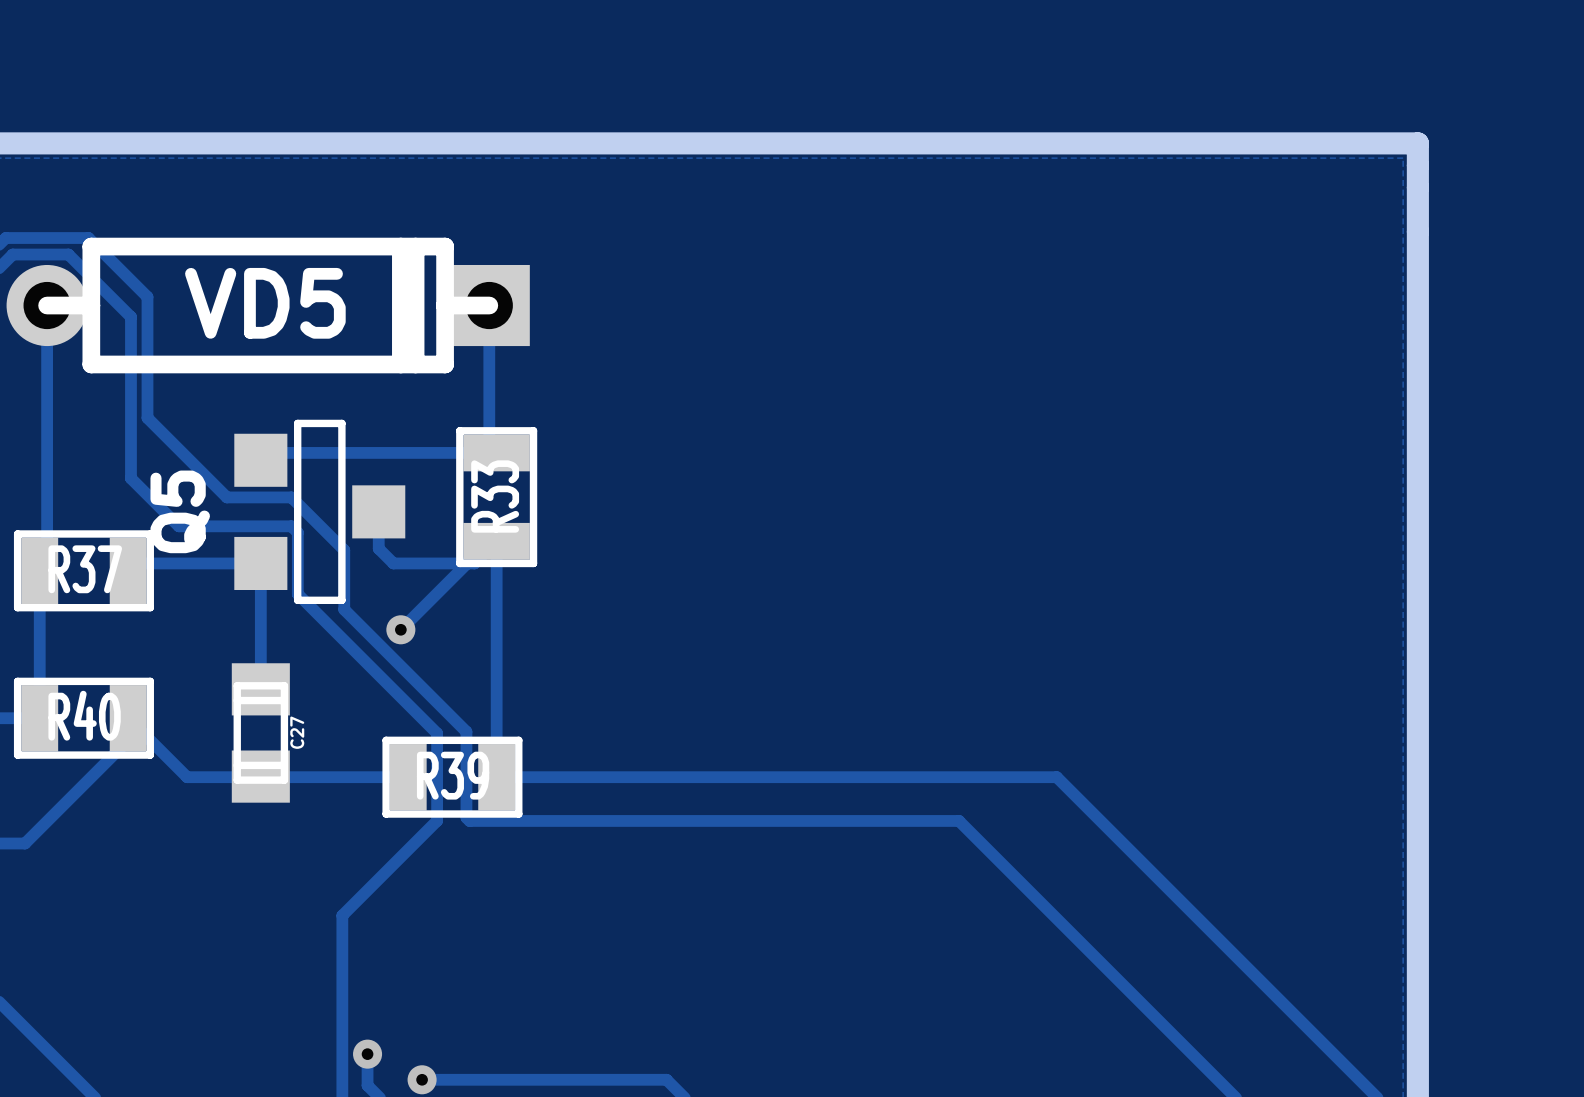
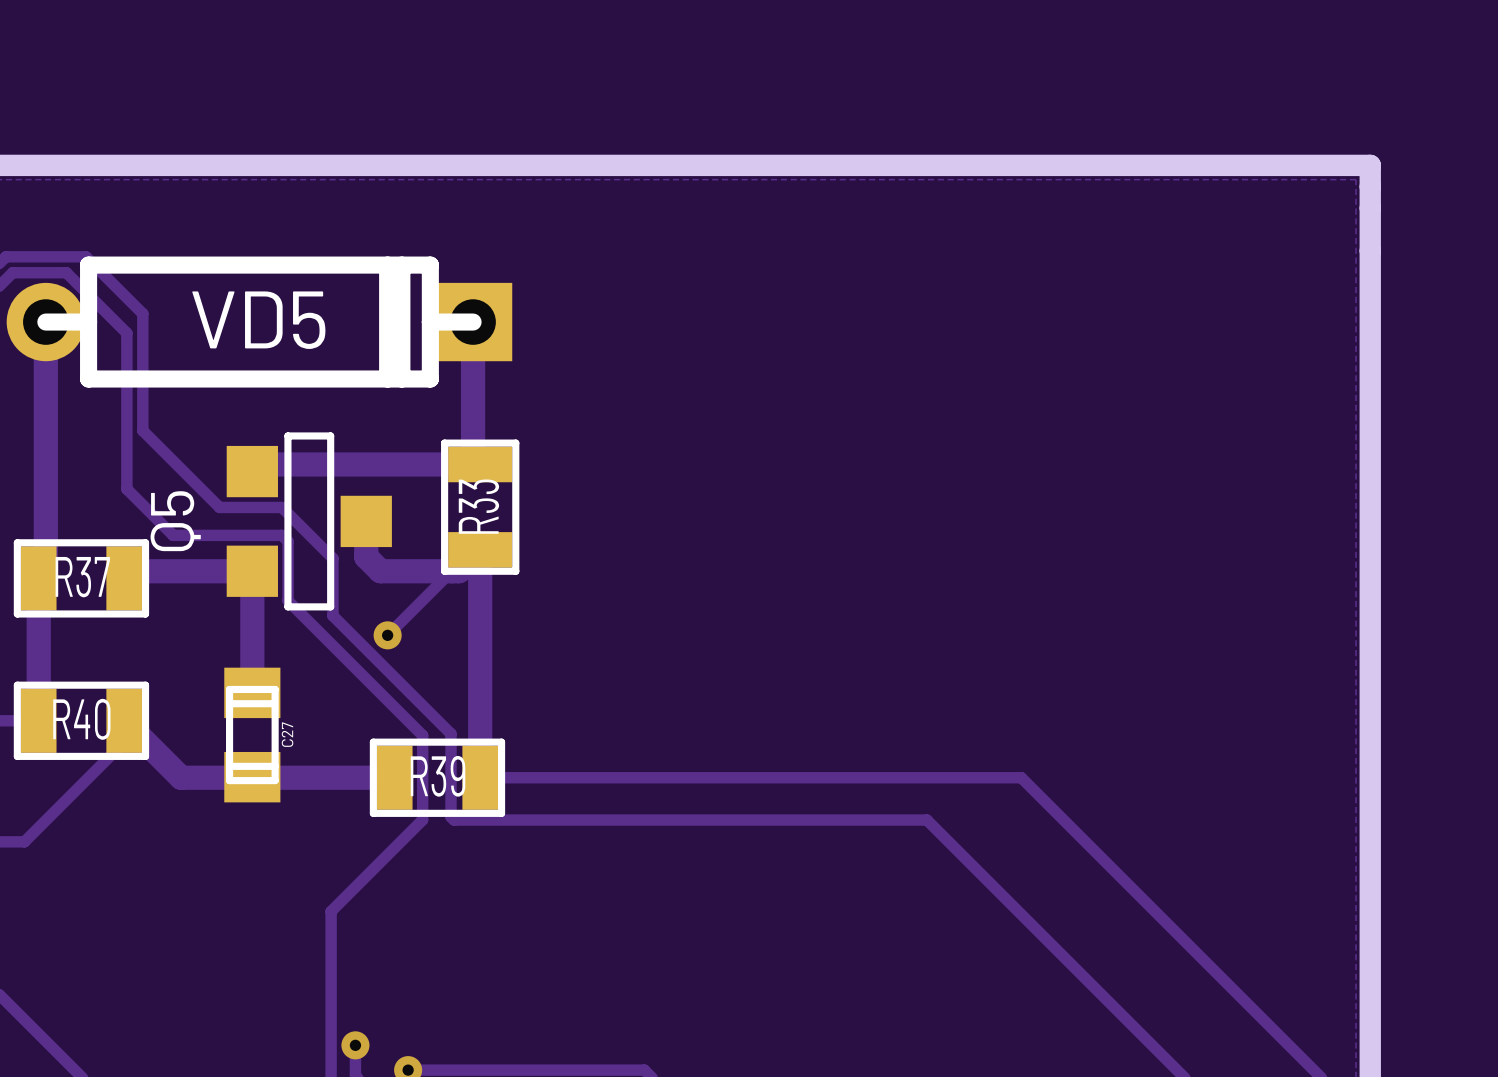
track width: thin (47, 305) (47, 563) (39, 570) (39, 718) -> thick (45, 322) (45, 571) (38, 578) (38, 720)
track width: thin (489, 305) (489, 445) (496, 452) (268, 452) (260, 460) -> thick (473, 322) (473, 457) (480, 464) (259, 464) (252, 471)
track width: thin (378, 511) (378, 548) (393, 563) (474, 563) (496, 541) (496, 777) -> thick (366, 521) (366, 557) (380, 571) (458, 571) (480, 549) (480, 777)
track width: thin (128, 570) (135, 563) (260, 563) (260, 689) -> thick (124, 578) (131, 571) (252, 571) (252, 692)
track width: thin (128, 718) (187, 777) (260, 777) -> thick (124, 720) (181, 777) (251, 777)
track width: thin (261, 777) (408, 777) -> thick (252, 777) (394, 777)

